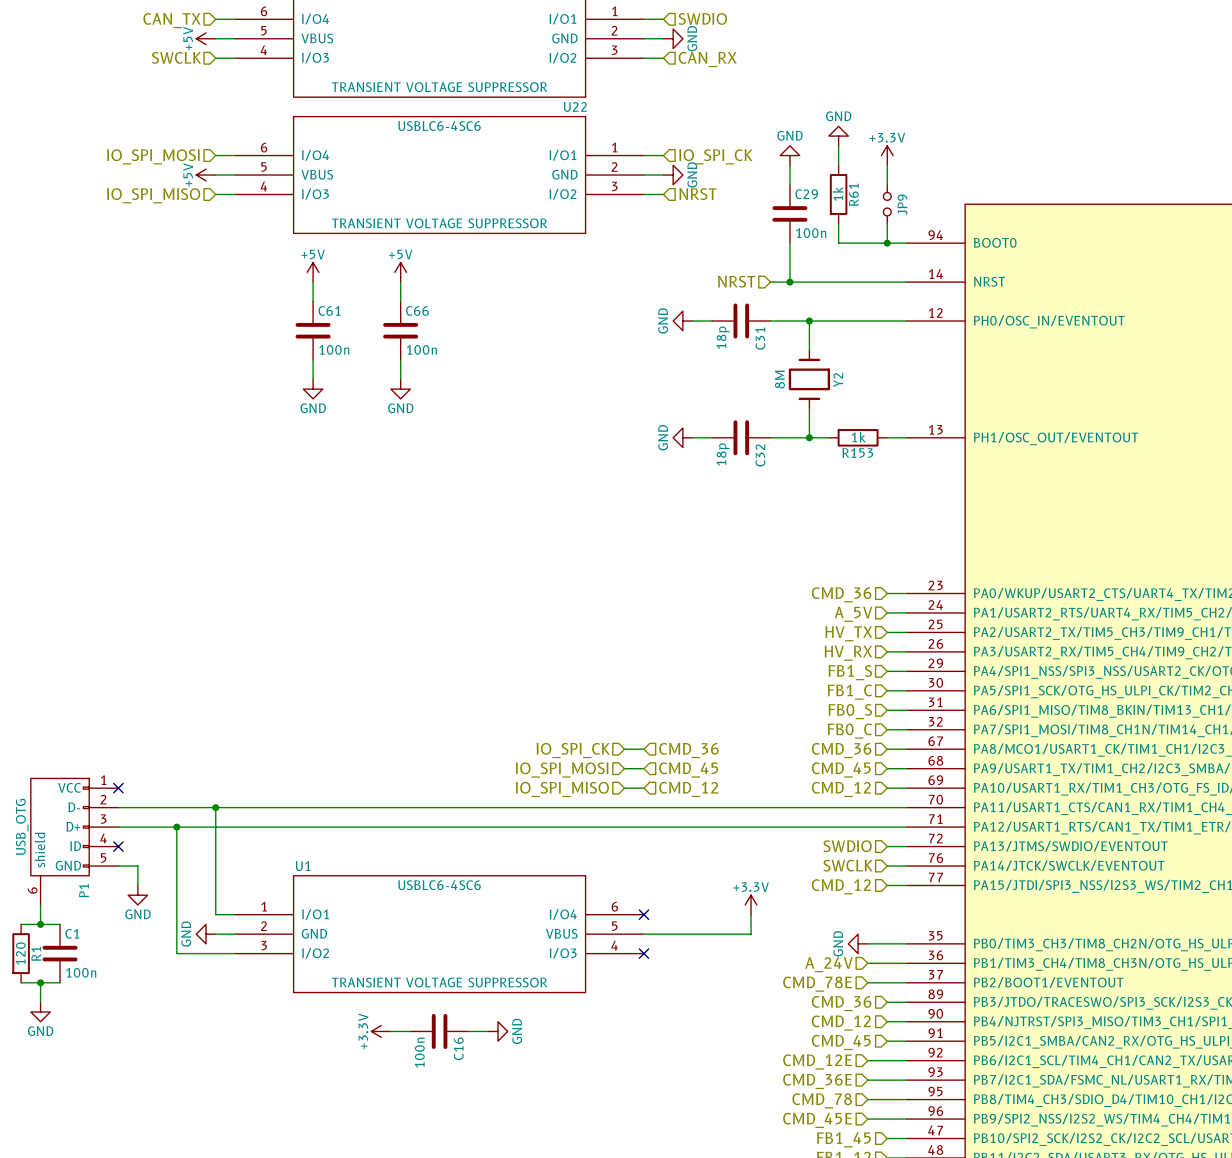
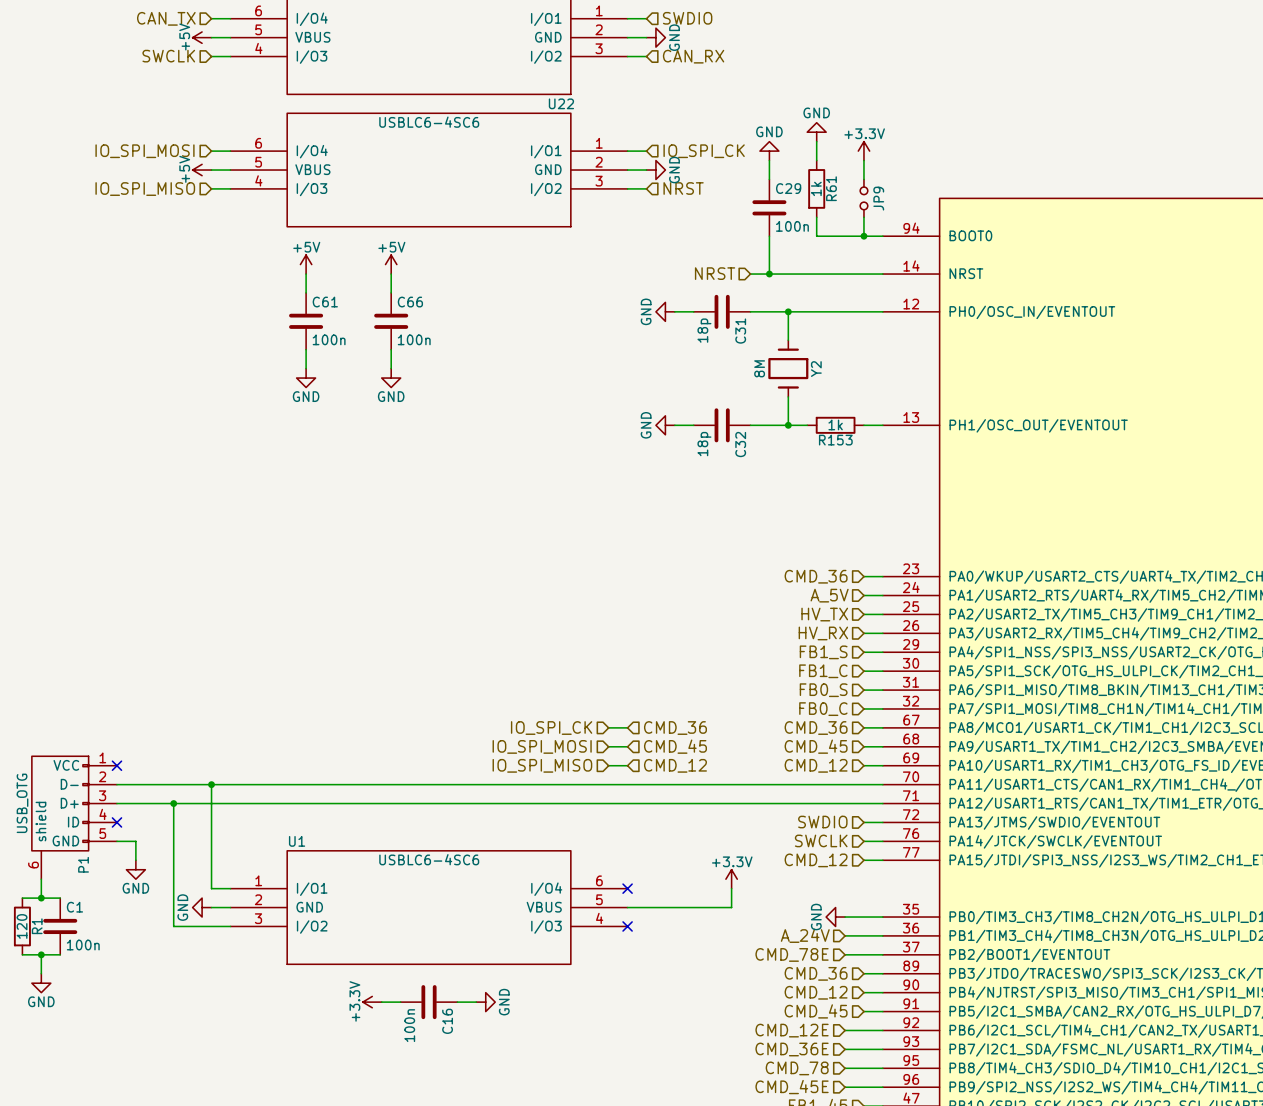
part text: TRANSIENT VOLTAGE SUPPRESSOR (439, 87) -> none
U22 text: TRANSIENT VOLTAGE SUPPRESSOR (439, 223) -> none
U1 text: TRANSIENT VOLTAGE SUPPRESSOR (439, 982) -> none

